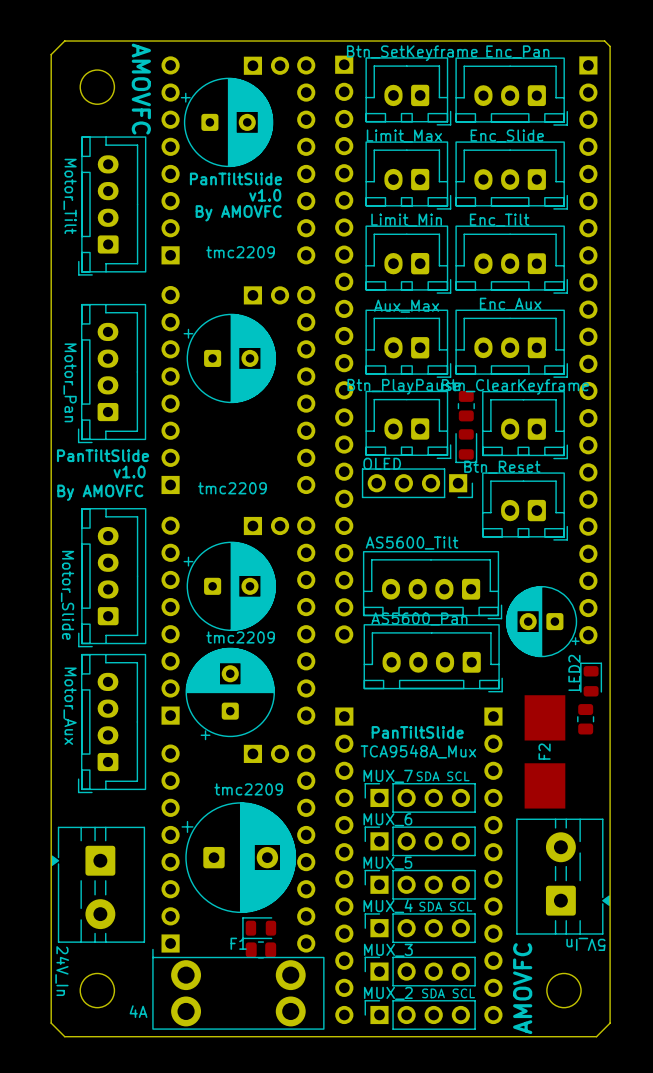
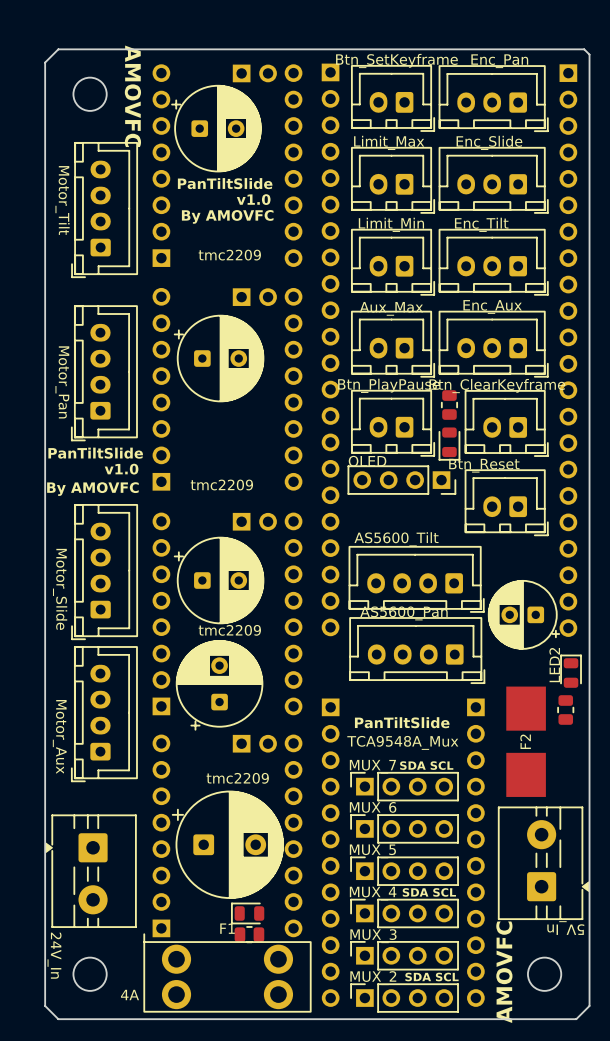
part value position: Motor_Aux (70, 706) -> Motor_Aux (59, 736)

